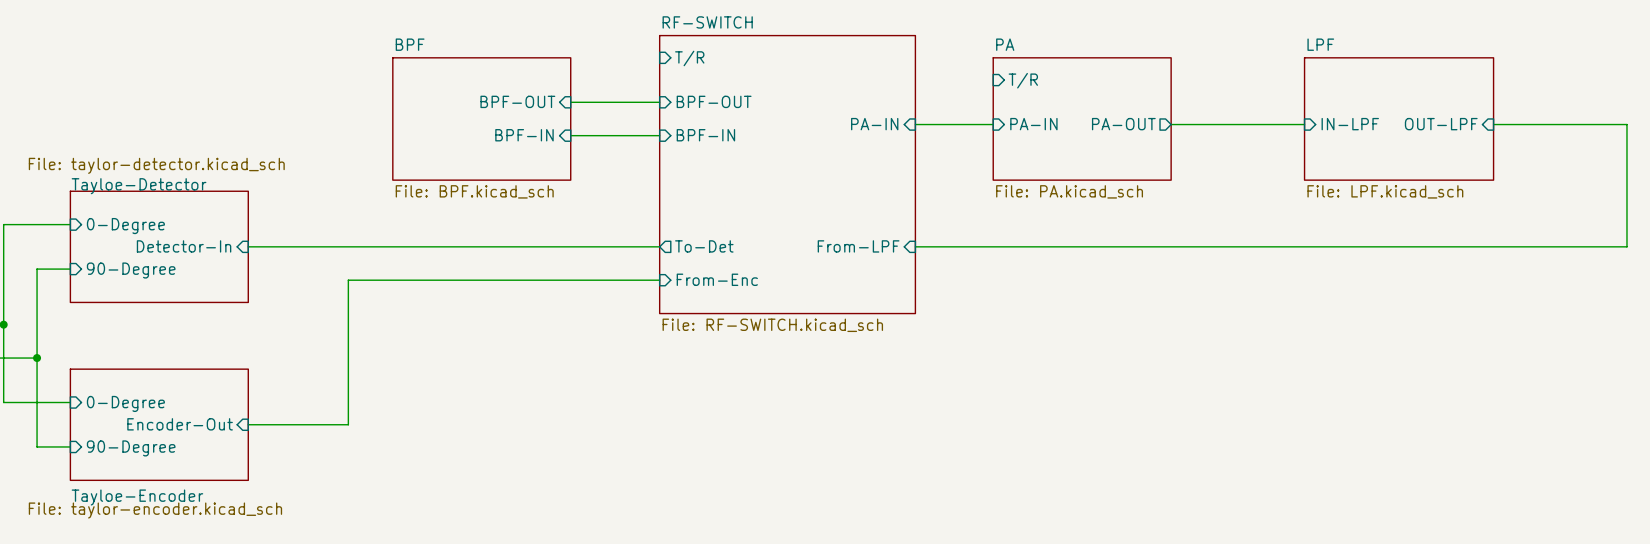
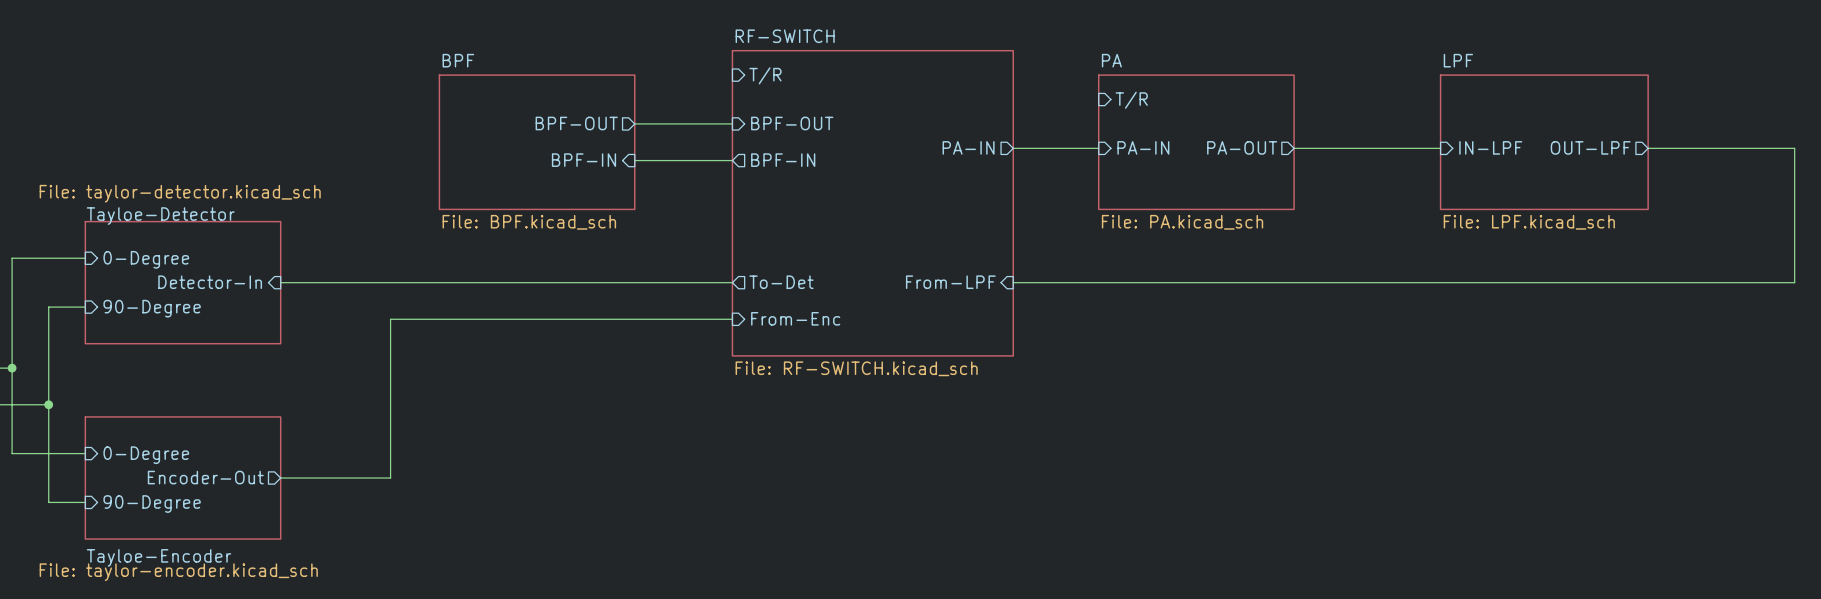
sheet pin shape: input (517, 101) -> output (576, 123)
sheet pin shape: input (874, 124) -> output (968, 147)
sheet pin shape: input (1441, 124) -> output (1590, 147)
sheet pin shape: input (705, 135) -> output (783, 160)
sheet pin shape: input (180, 424) -> output (205, 477)

